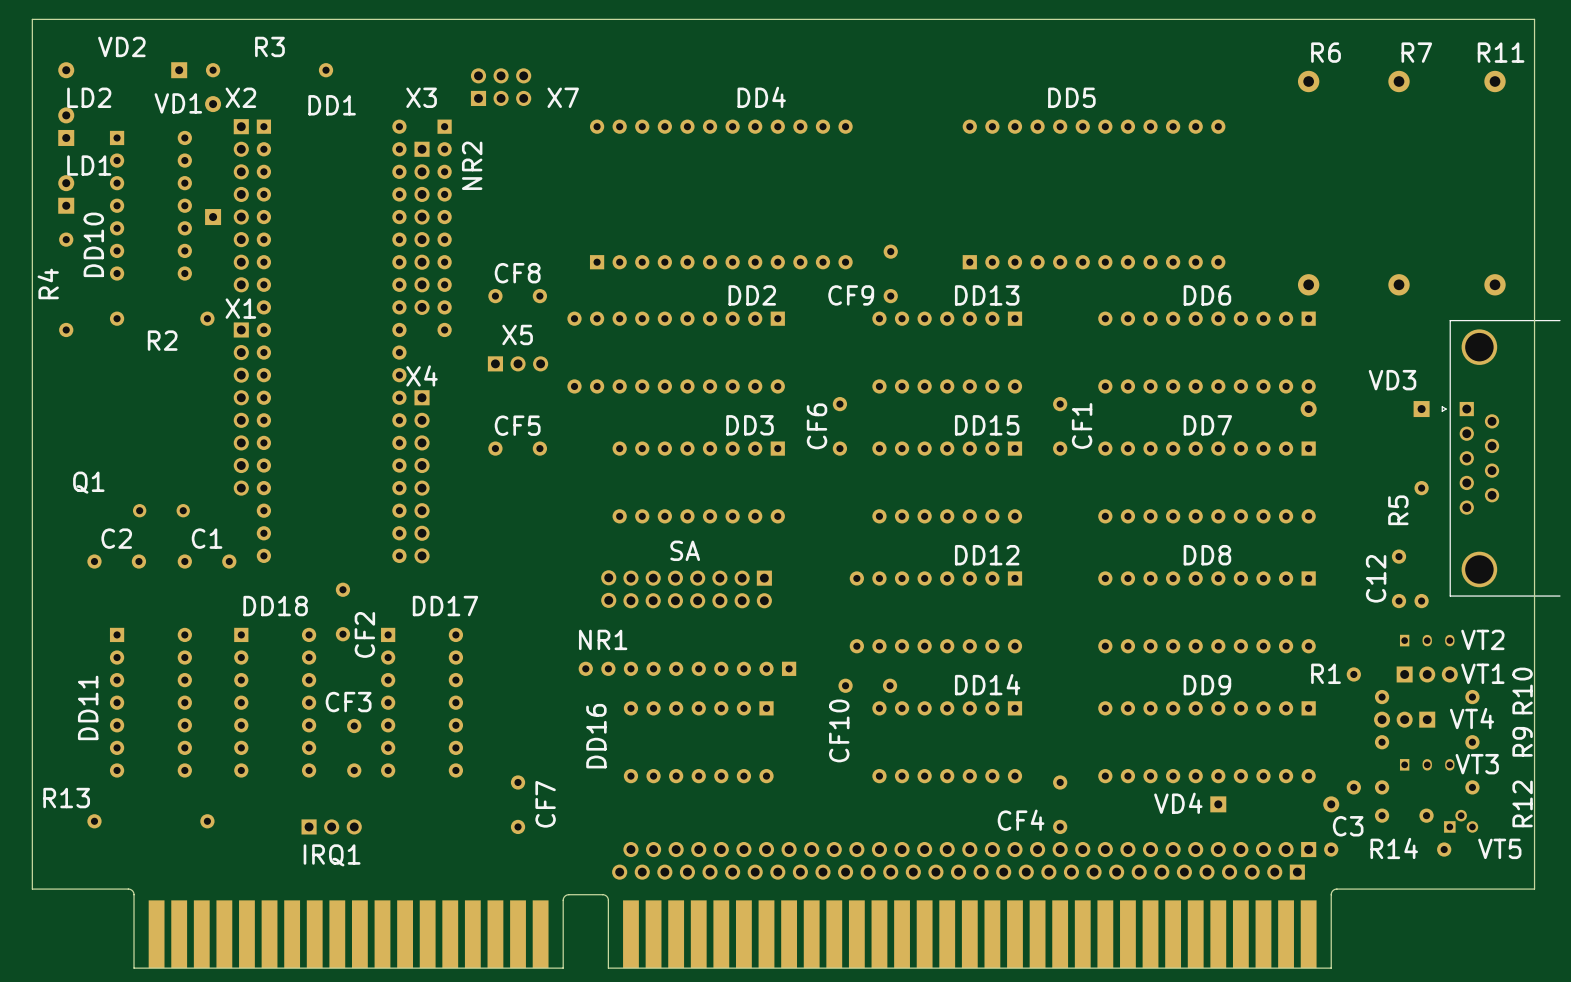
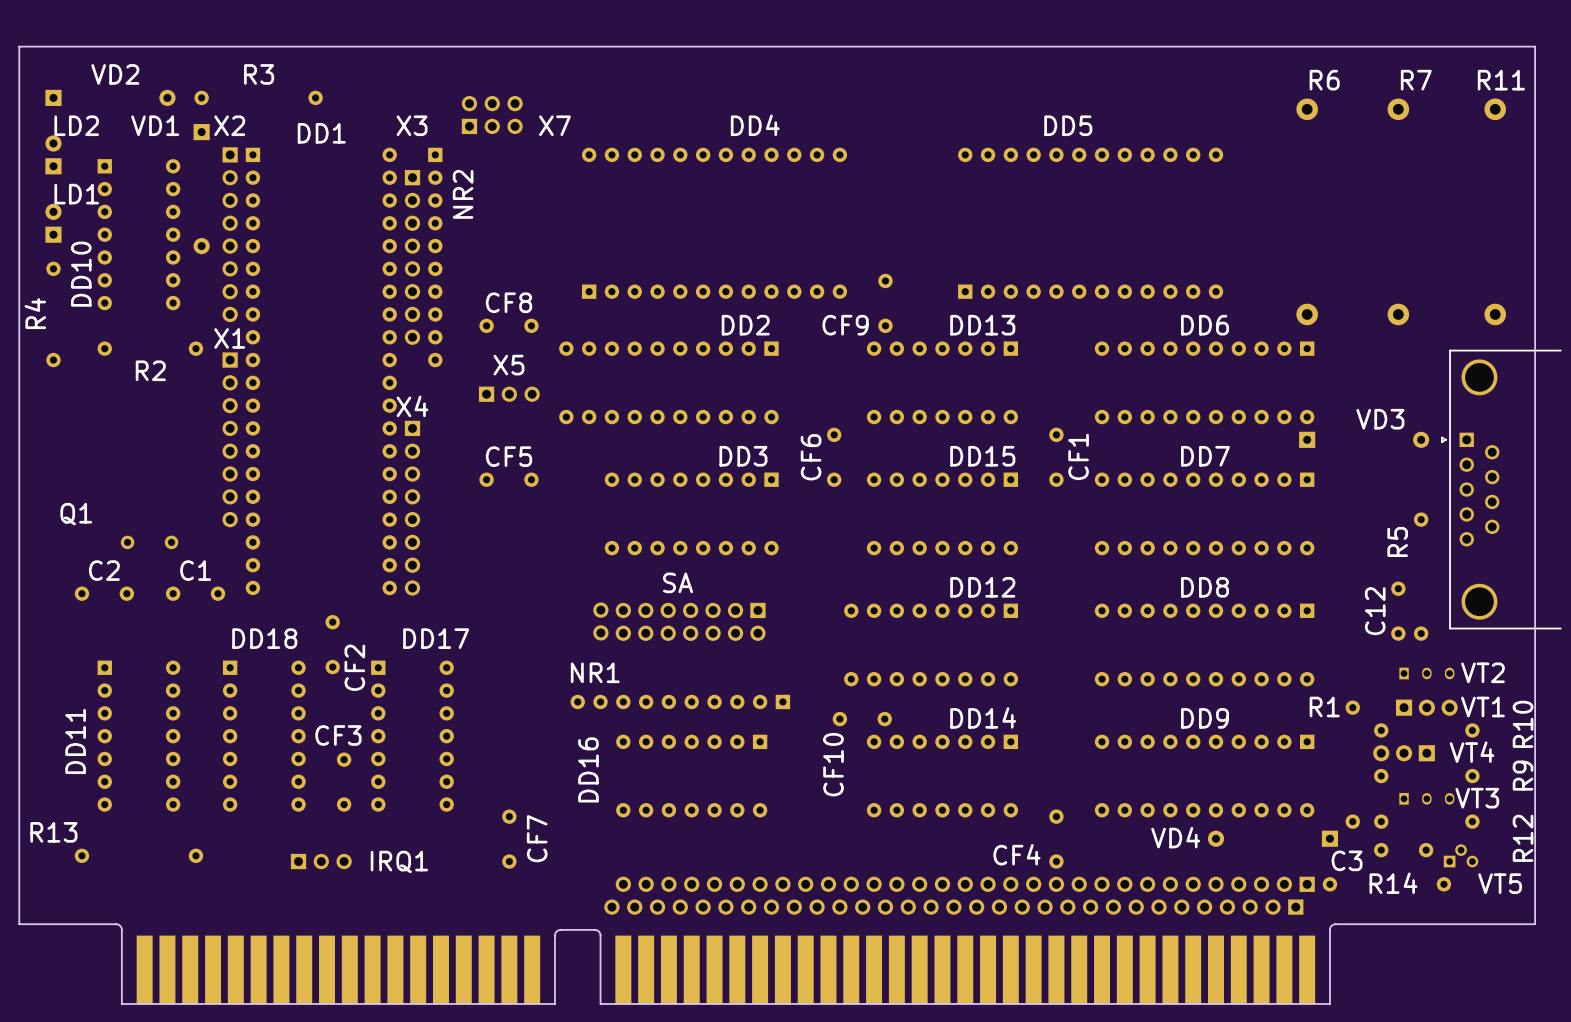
VD2 rotation: 0° (122, 70) -> 180° (110, 97)
VD1 rotation: 0° (213, 160) -> 180° (201, 189)
VD3 rotation: 0° (1365, 409) -> 180° (1364, 439)
VD4 rotation: 0° (1274, 804) -> 180° (1272, 838)
IRQ1 name position: IRQ1 (332, 855) -> IRQ1 (399, 861)

